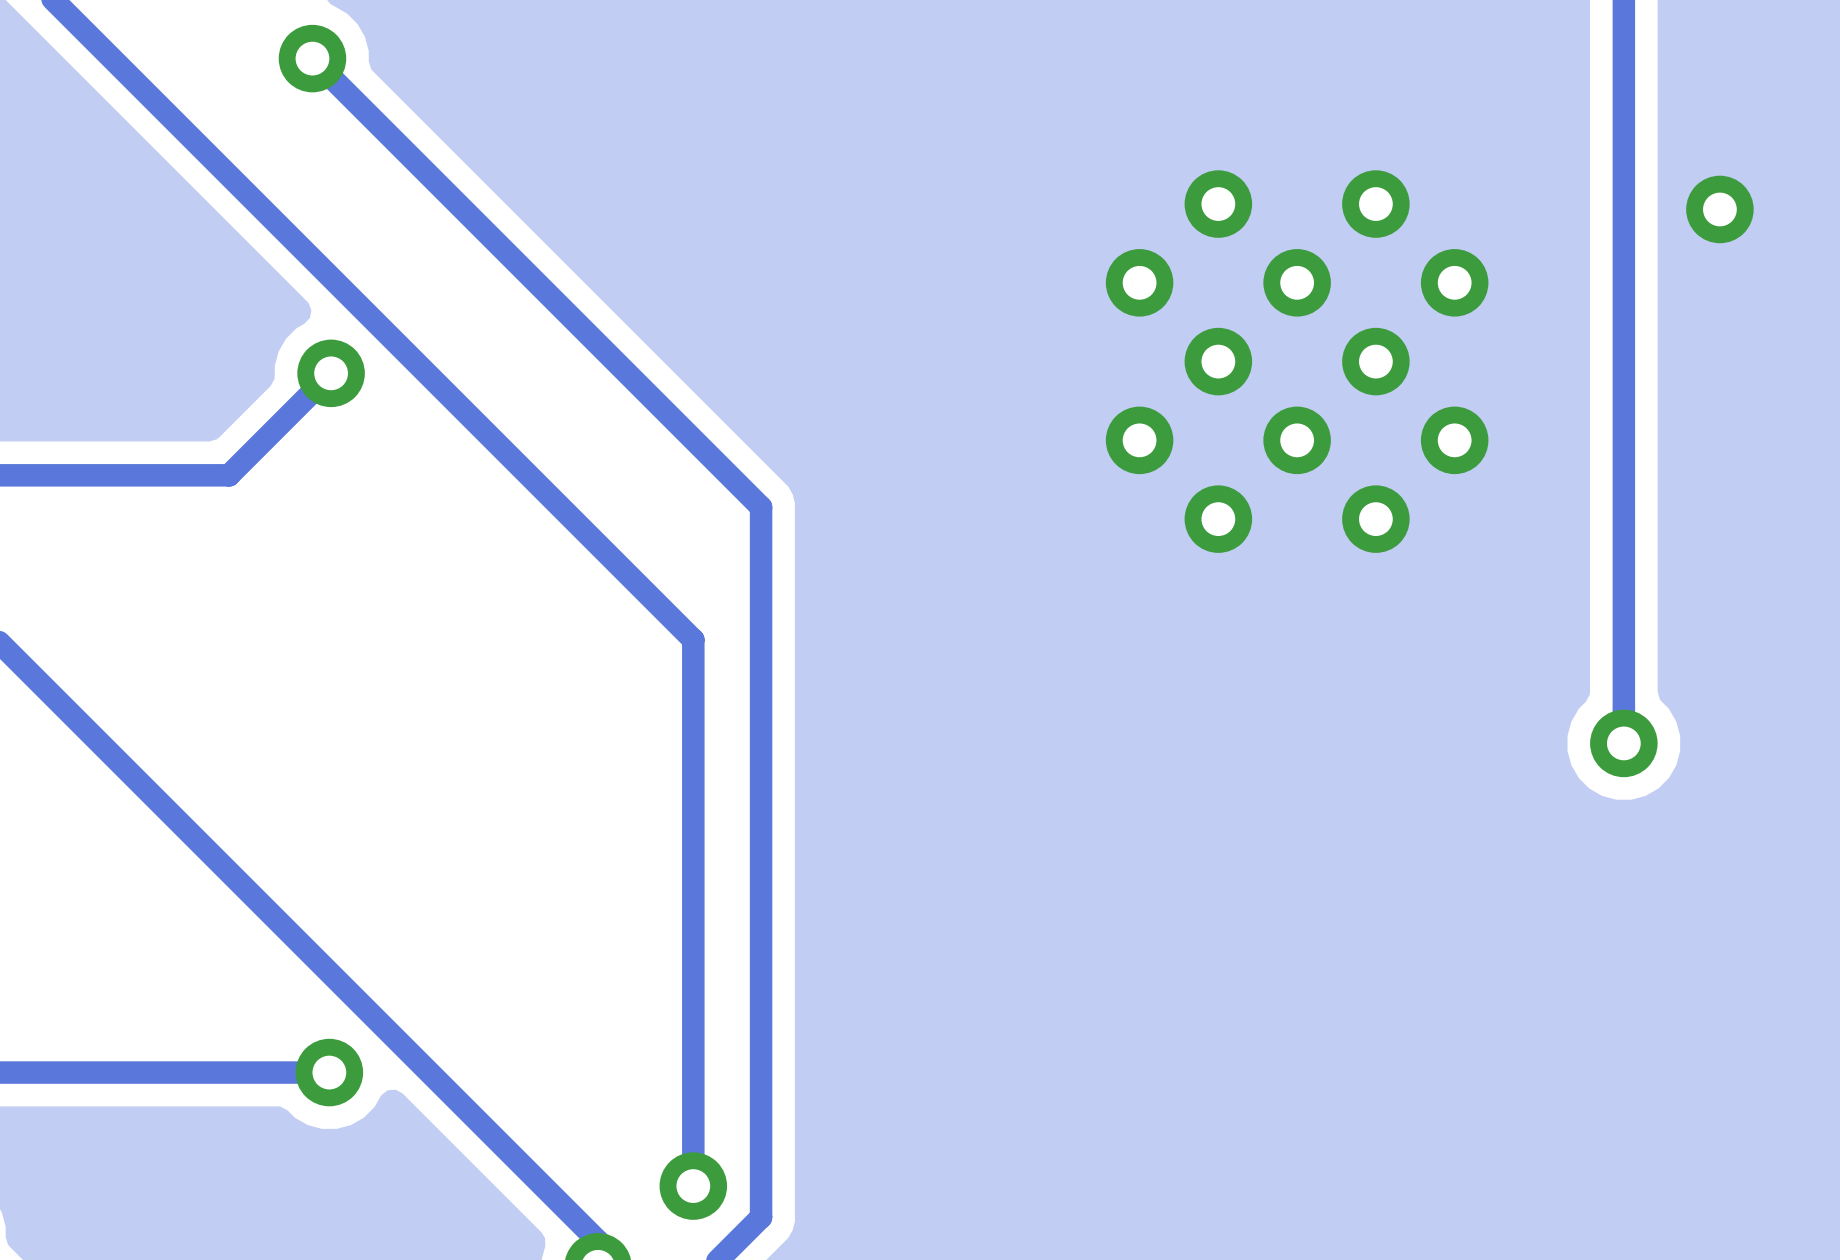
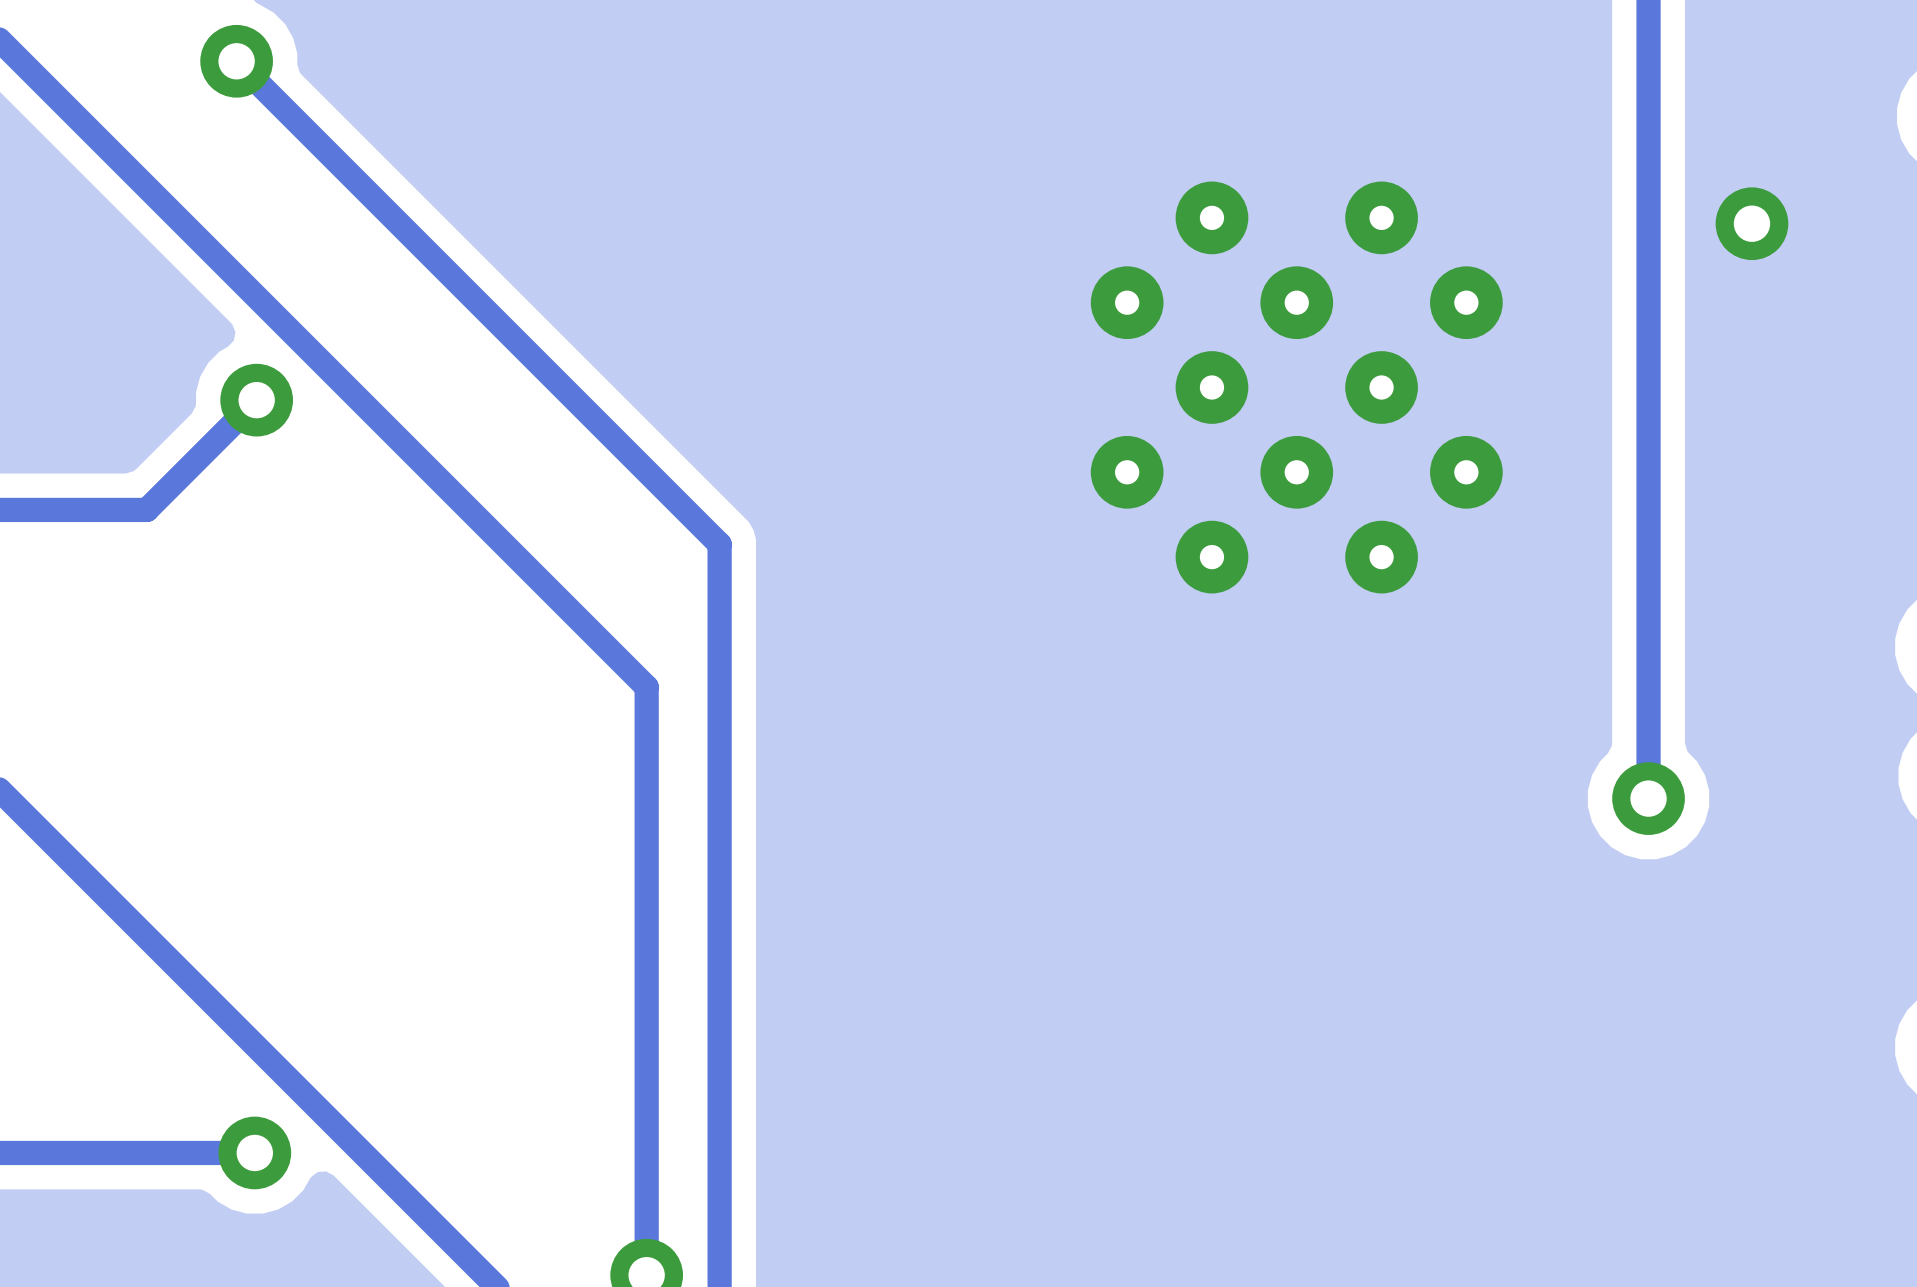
part footprint: [1105, 170, 1489, 553] -> [1090, 181, 1503, 594]

